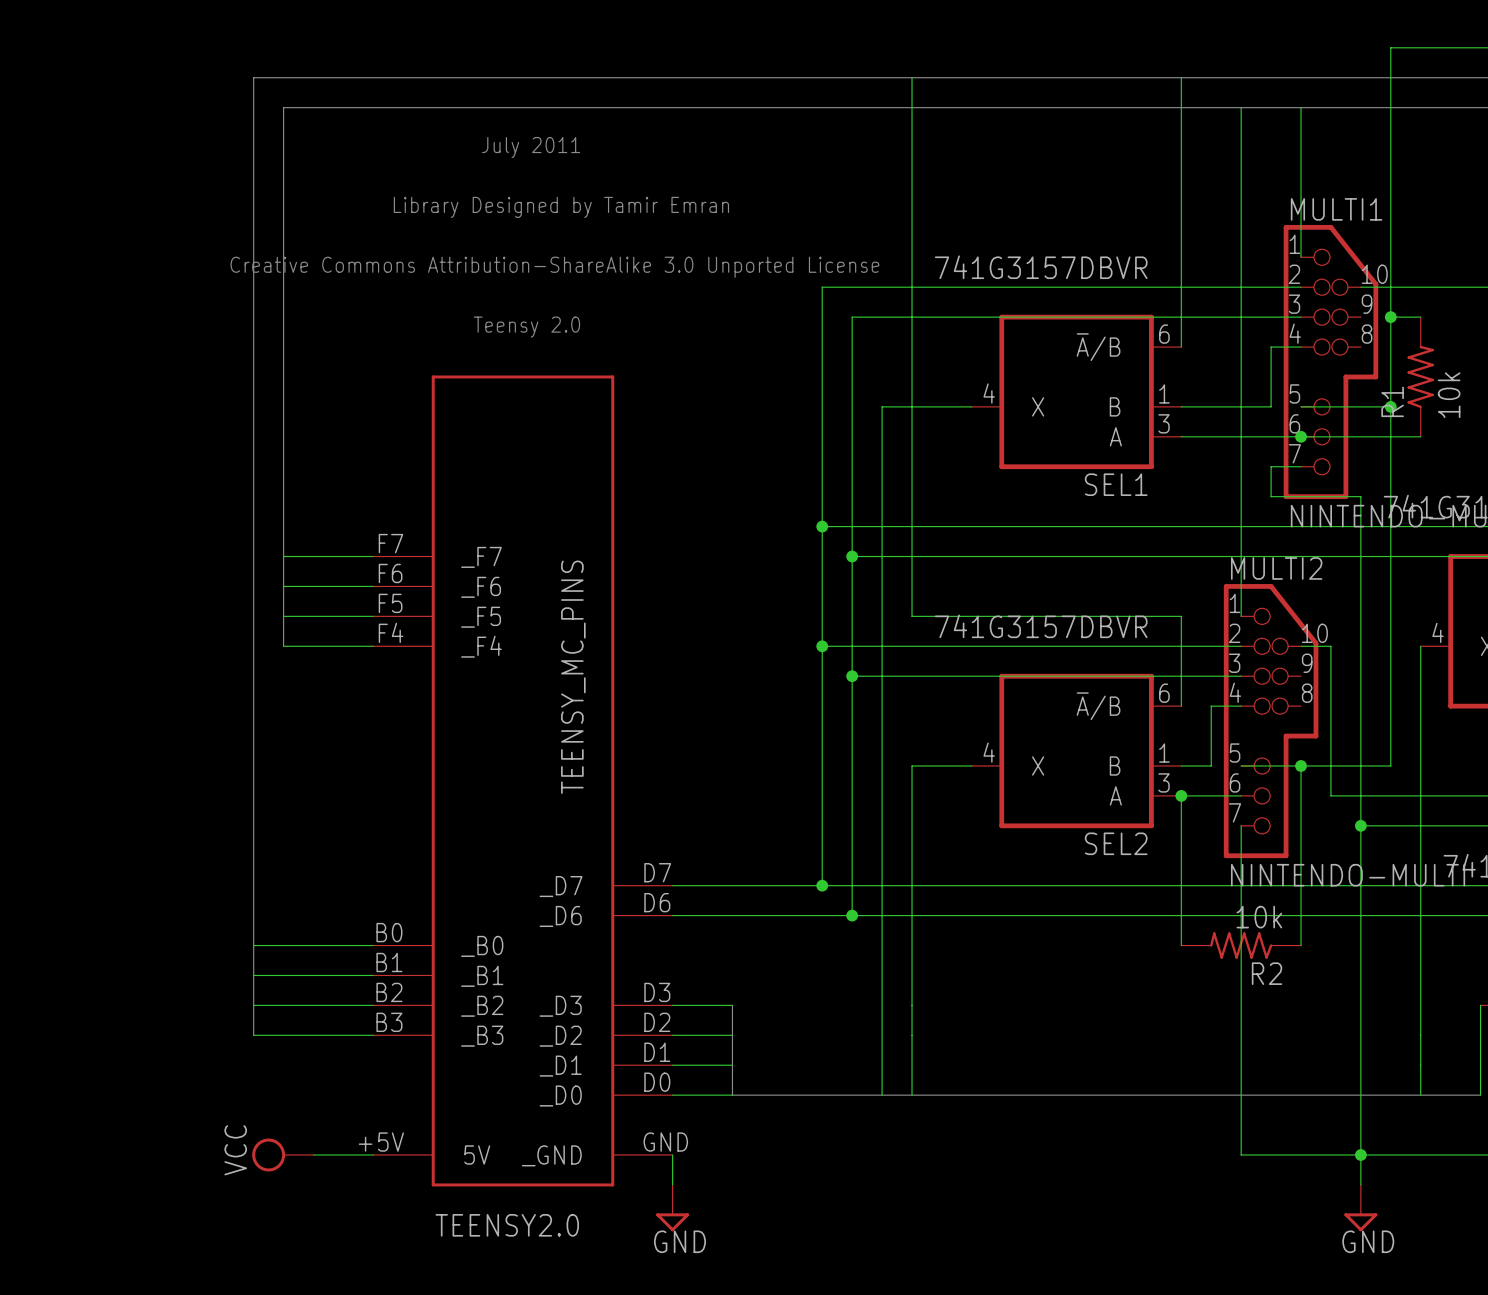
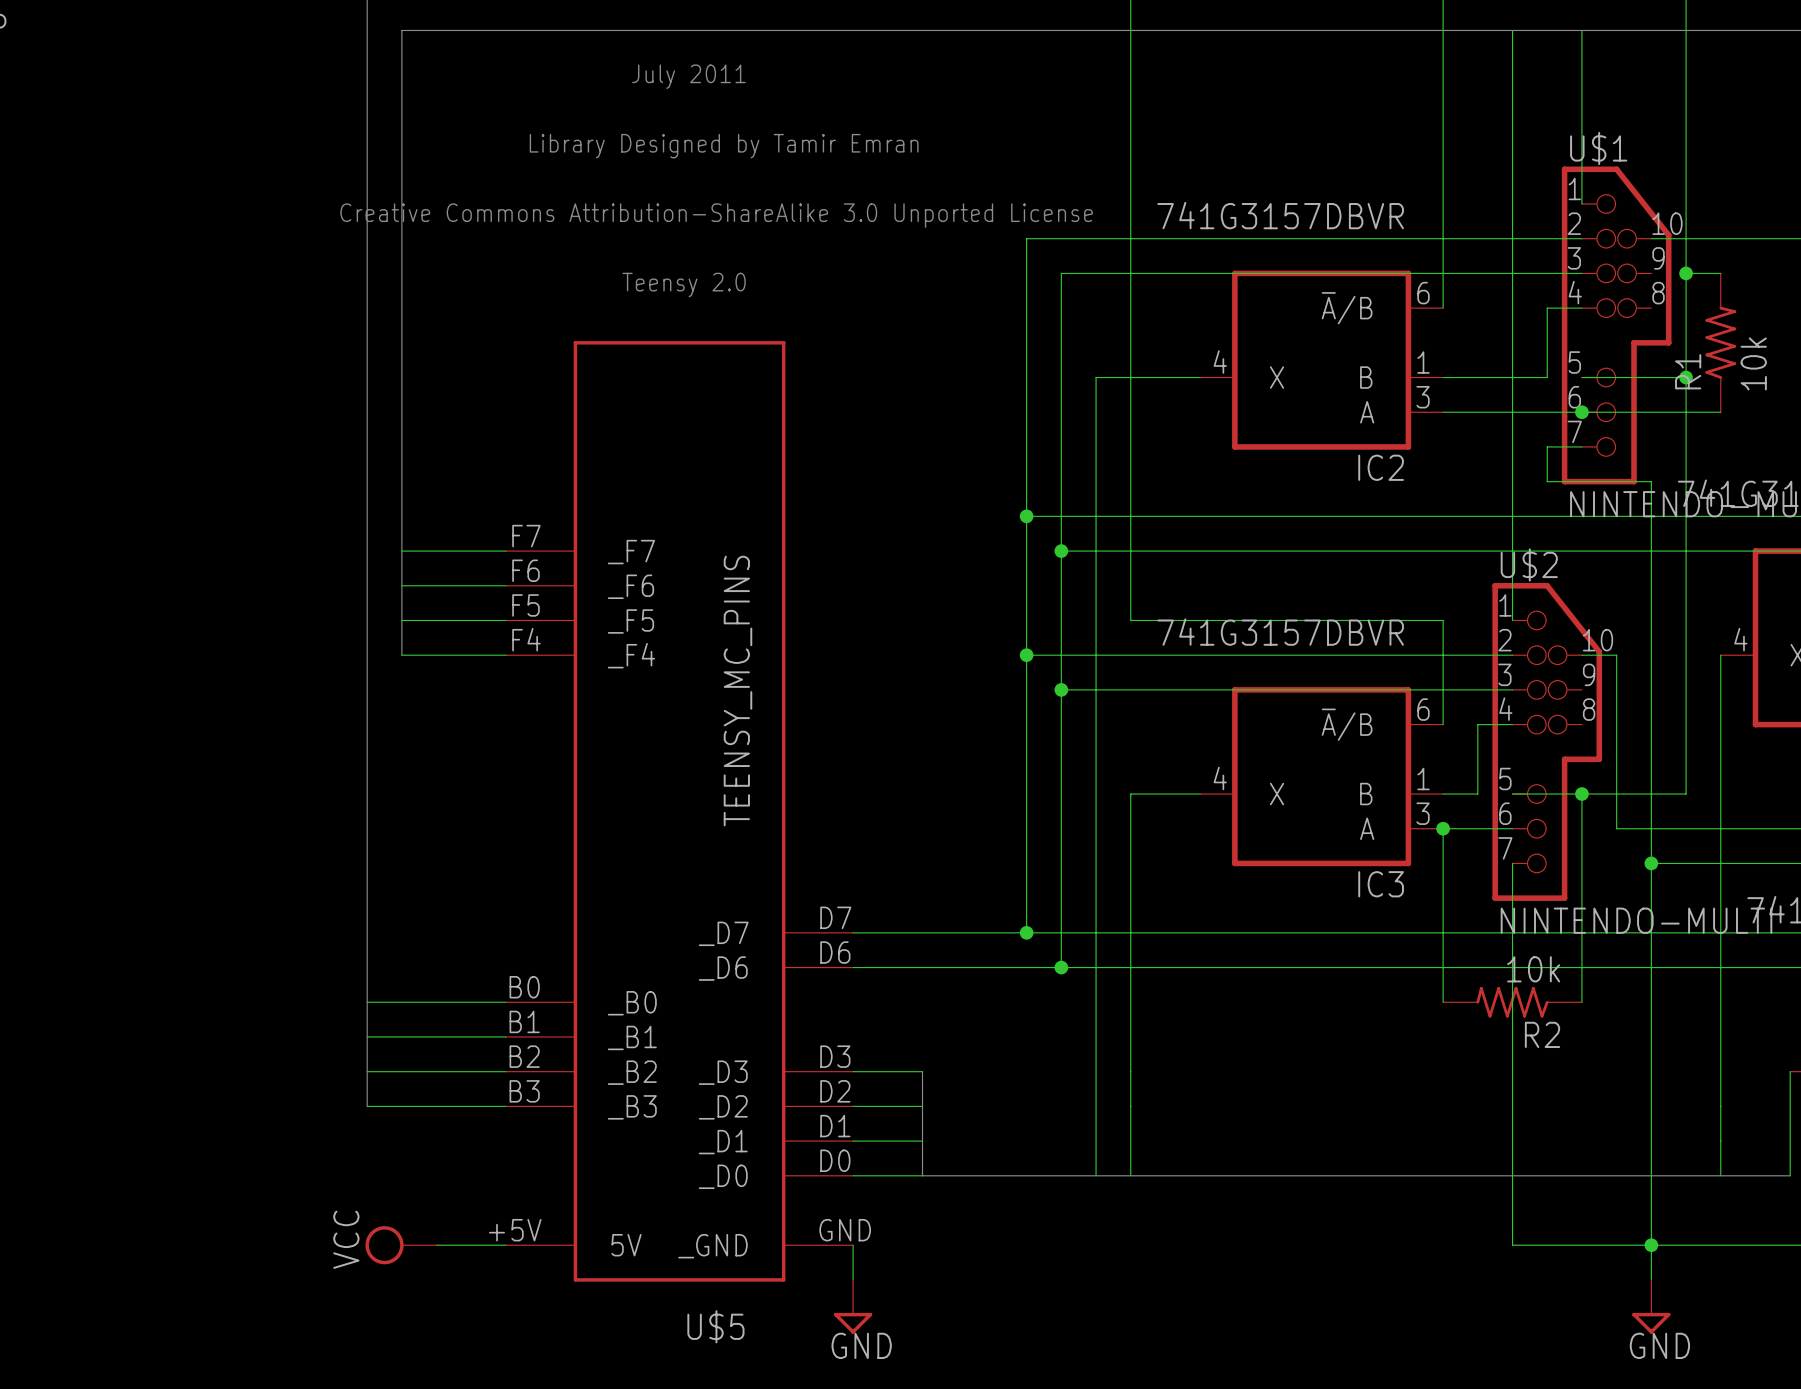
MULTI1 name: MULTI1 (1336, 209) -> U$1 (1598, 148)
SEL1 name: SEL1 (1116, 484) -> IC2 (1381, 467)
MULTI2 name: MULTI2 (1276, 568) -> U$2 (1529, 564)
SEL2 name: SEL2 (1116, 843) -> IC3 (1381, 884)
TEENSY2.0 name: TEENSY2.0 (507, 1225) -> U$5 (715, 1326)

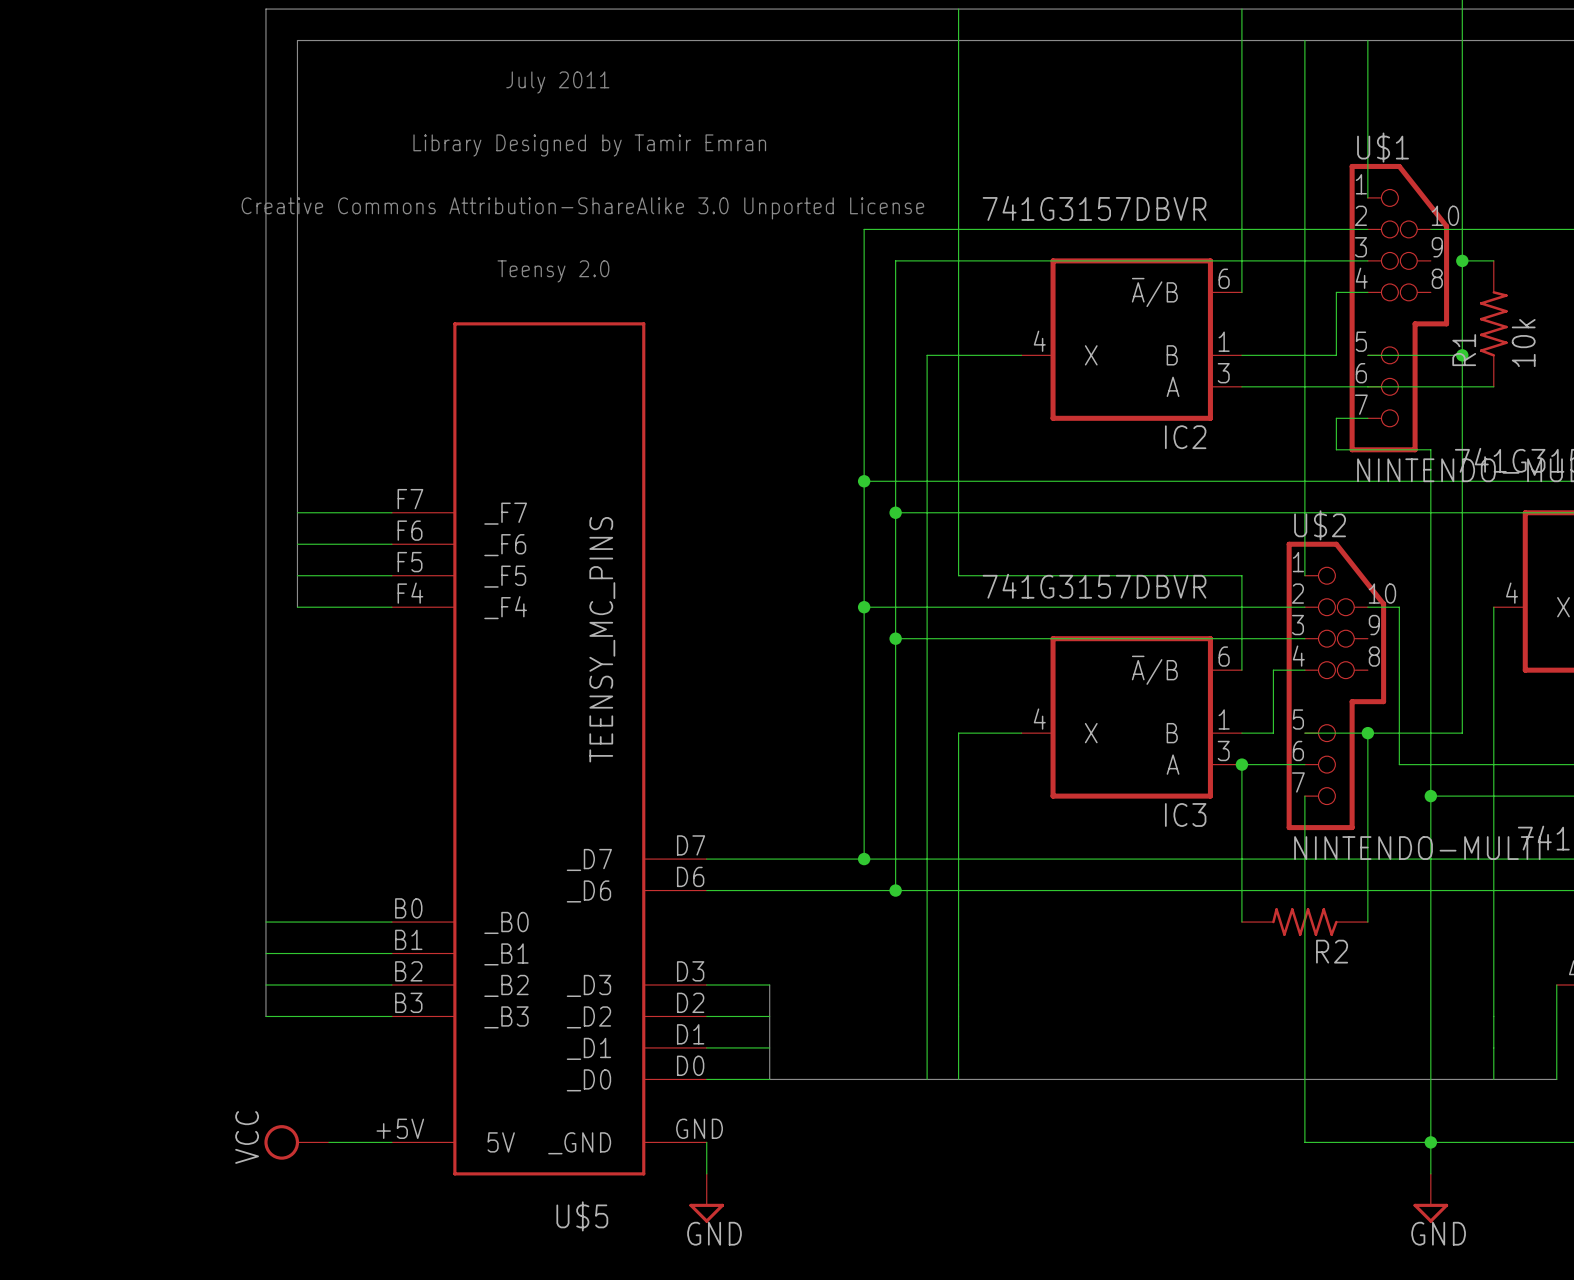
junction: (1581, 412) -> none
R2 value: 10k (1533, 969) -> none

